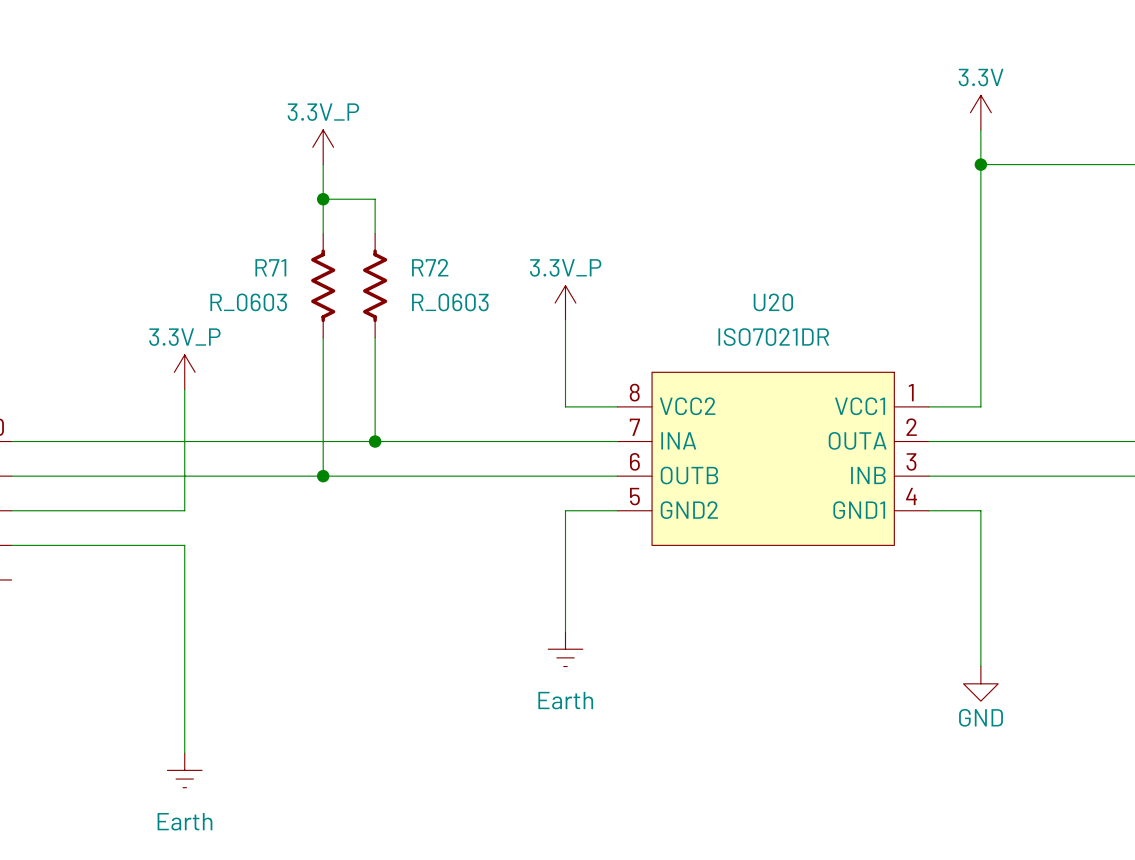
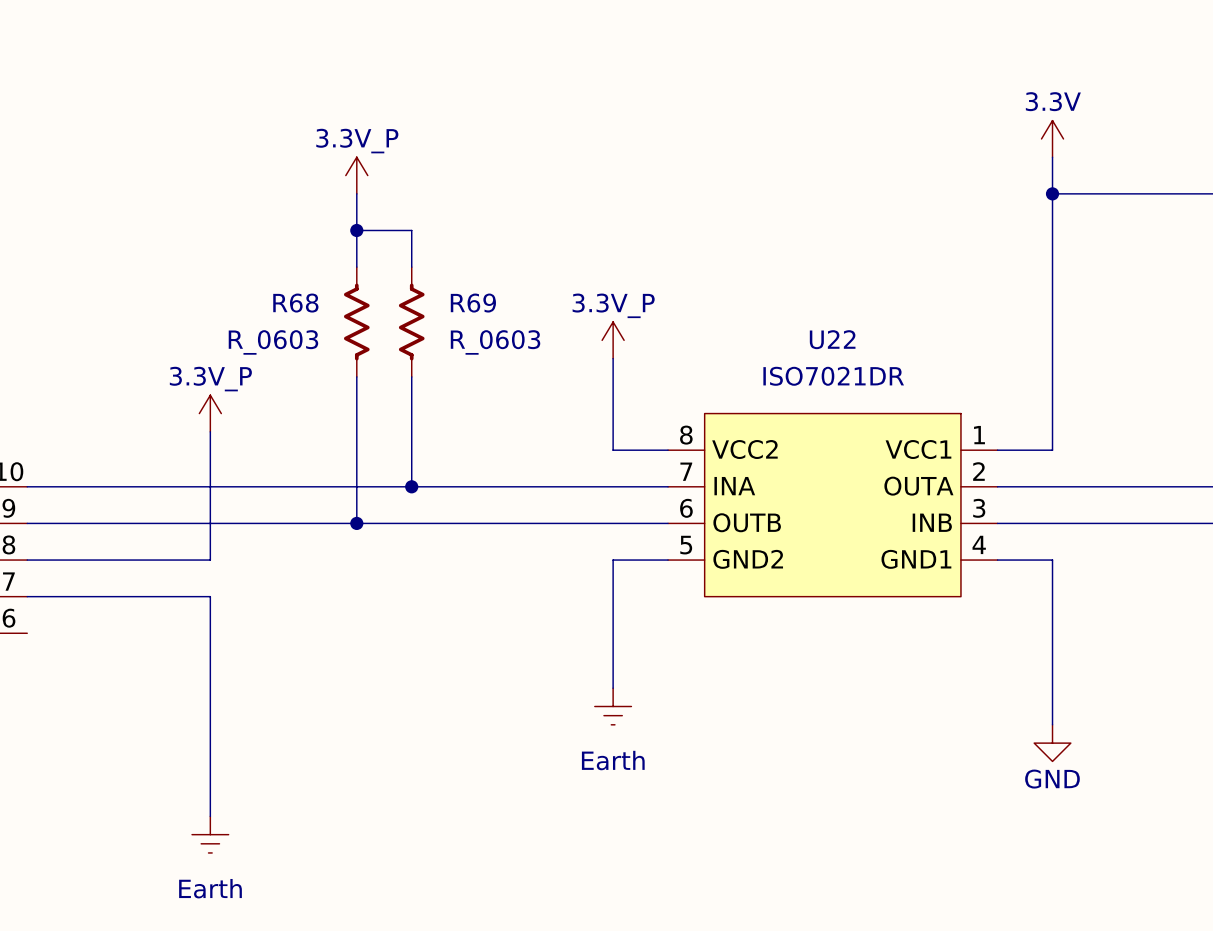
R71 name: R71 (270, 267) -> R68 (295, 303)
R72 name: R72 (430, 267) -> R69 (473, 303)
U20 name: U20 (773, 302) -> U22 (832, 339)

